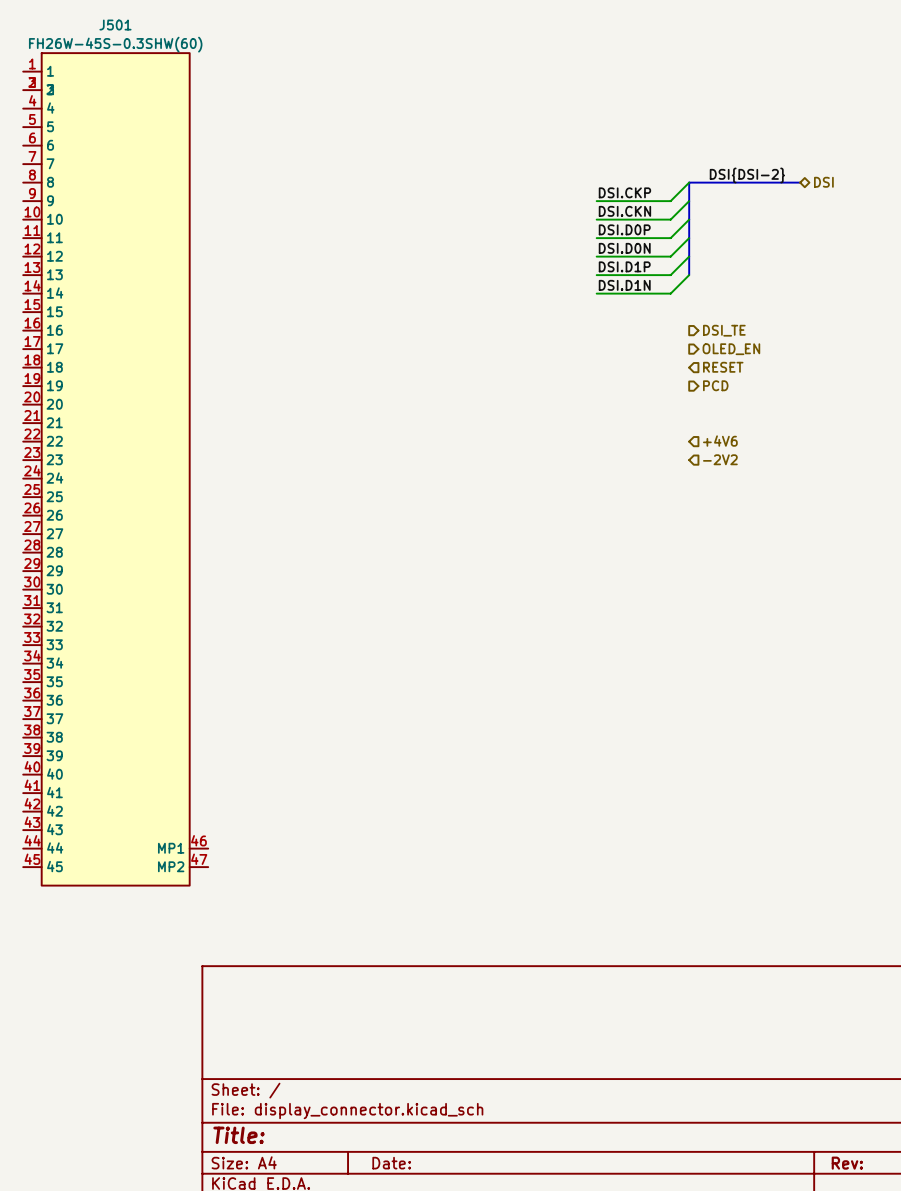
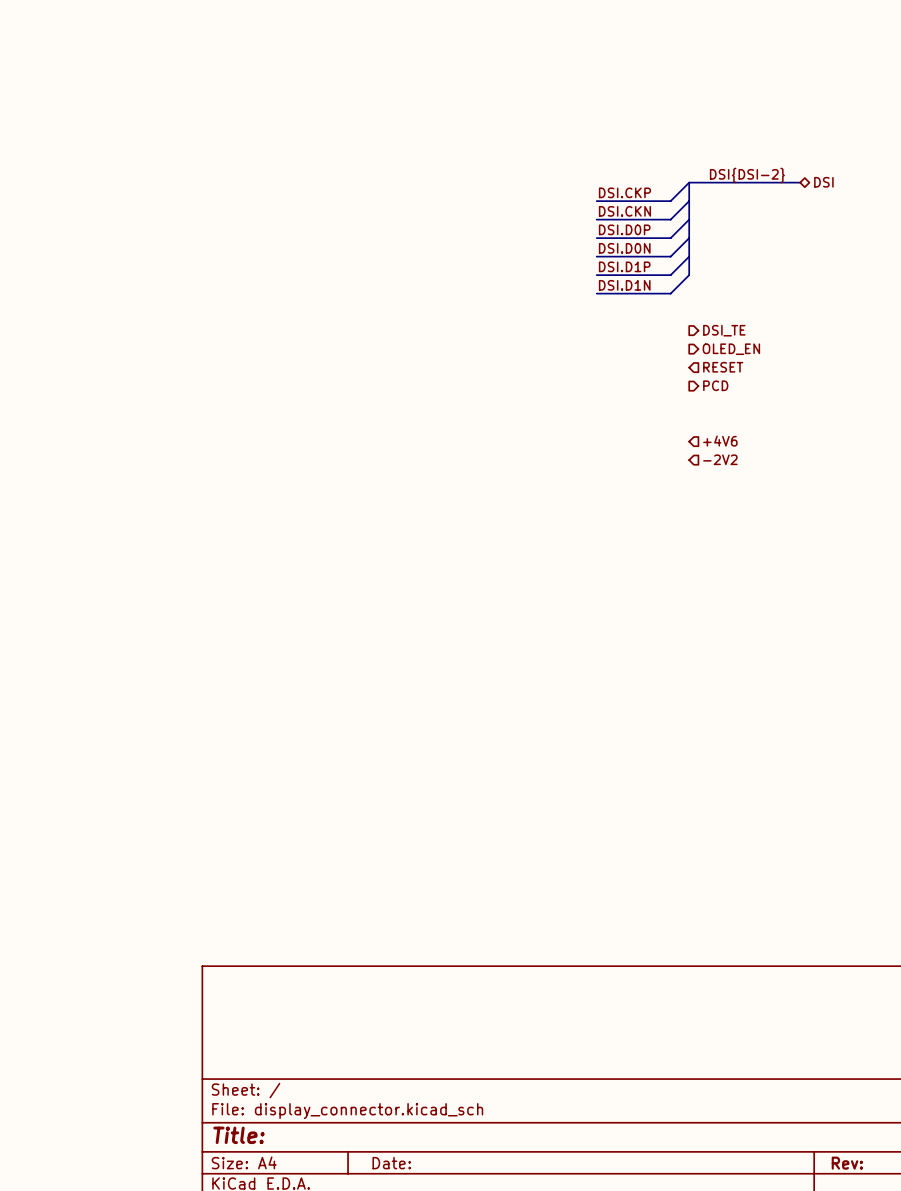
J501: FH26W-45S-0.3SHW(60) (115, 469) -> none

